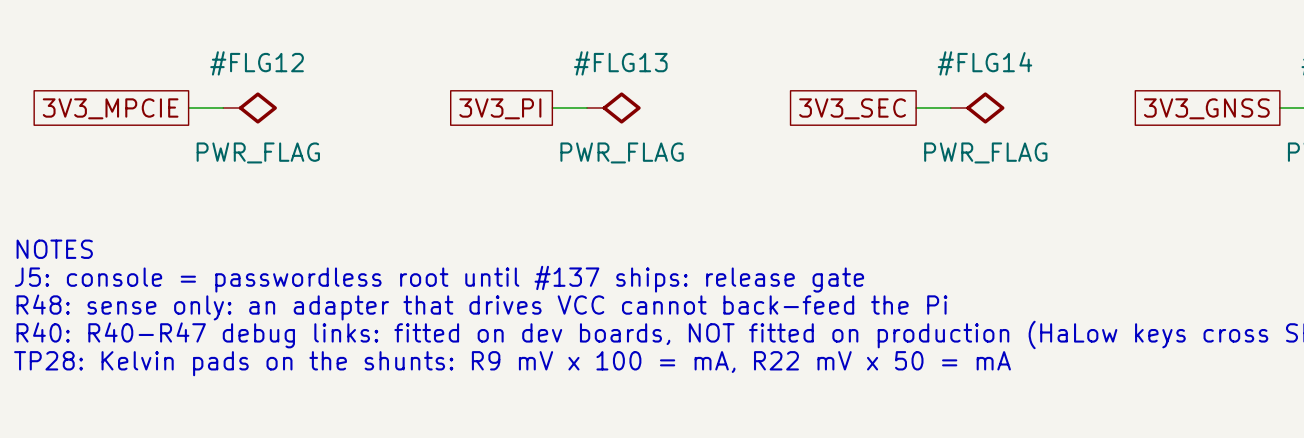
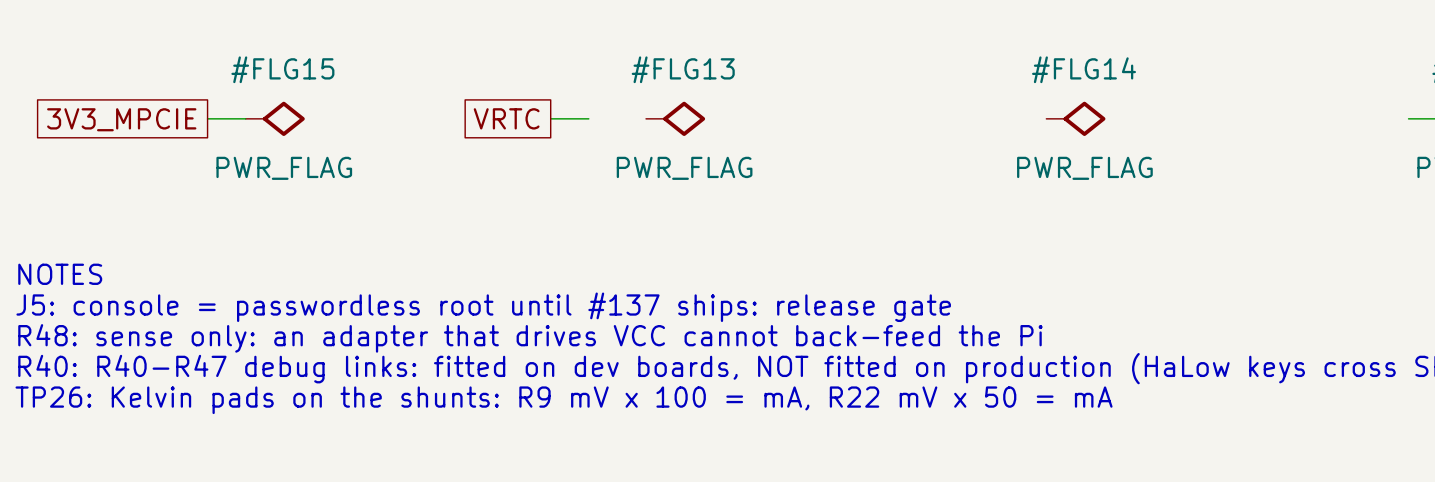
#FLG12 name: #FLG12 (257, 63) -> #FLG15 (282, 69)
global label: none -> VRTC (506, 118)
global label: 3V3_PI (500, 108) -> none
wire: (552, 108) (587, 108) -> (550, 118) (588, 118)
global label: 3V3_SEC (852, 108) -> none
wire: (916, 108) (950, 108) -> none
global label: 3V3_GNSS (1206, 108) -> none
text: TP28: Kelvin pads on the shunts: R9 mV x 100 = mA, R22 mV x 50 = mA (512, 363) -> TP26: Kelvin pads on the shunts: R9 mV x 100 = mA, R22 mV x 50 = mA (564, 400)

